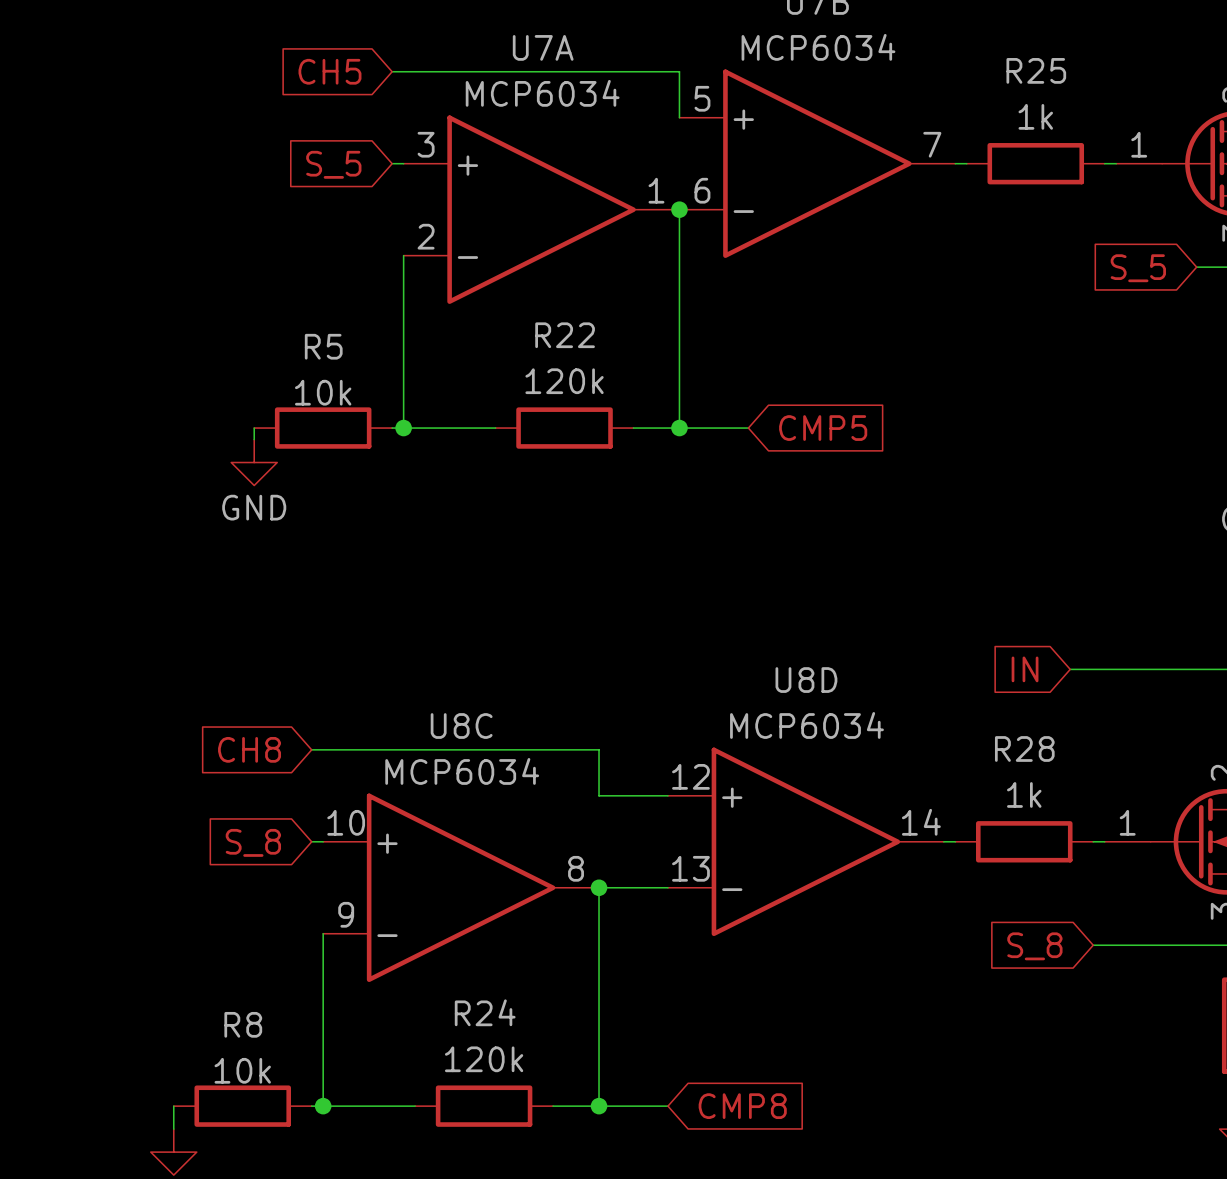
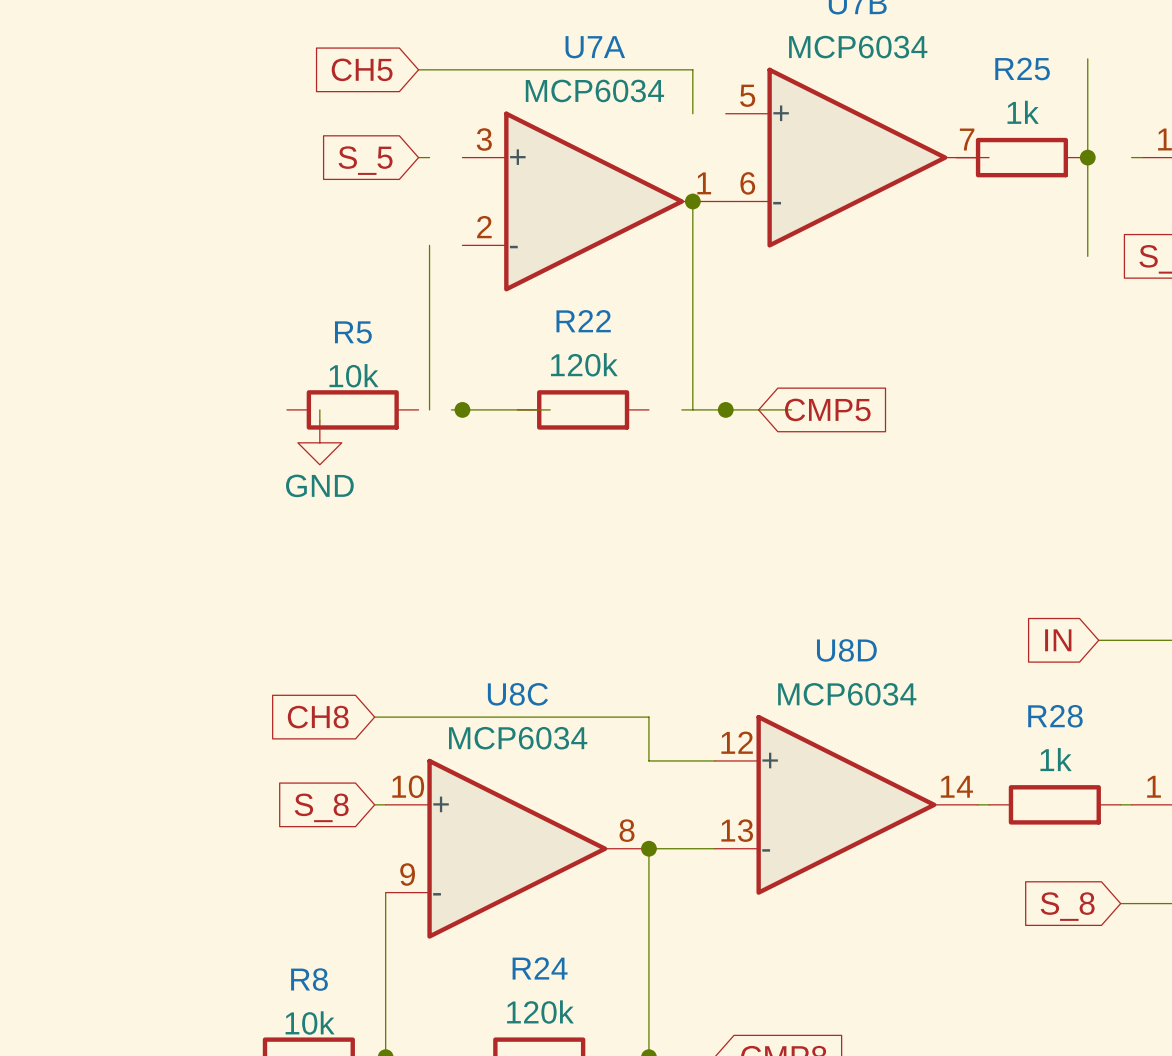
wire: none -> (1087, 58) (1087, 256)
global label position: CH5 (329, 71) -> CH5 (362, 69)
wire: none -> (418, 69) (451, 69)
wire: (644, 71) (679, 71) (679, 117) -> (692, 69) (692, 113)
wire: (392, 163) (403, 163) -> (418, 157) (429, 157)
wire: (955, 163) (966, 163) -> none
R25 position: (1035, 163) -> (1021, 157)
junction: none -> (1087, 157)
global label position: S_5 (333, 164) -> S_5 (365, 160)
wire: (679, 209) (679, 428) -> (692, 201) (692, 409)
junction position: (679, 209) -> (692, 201)
wire: (403, 255) (403, 428) -> (429, 245) (429, 409)
R5 position: (323, 428) -> (352, 409)
R22 position: (564, 428) -> (583, 409)
global label position: CMP5 (823, 428) -> CMP5 (827, 409)

